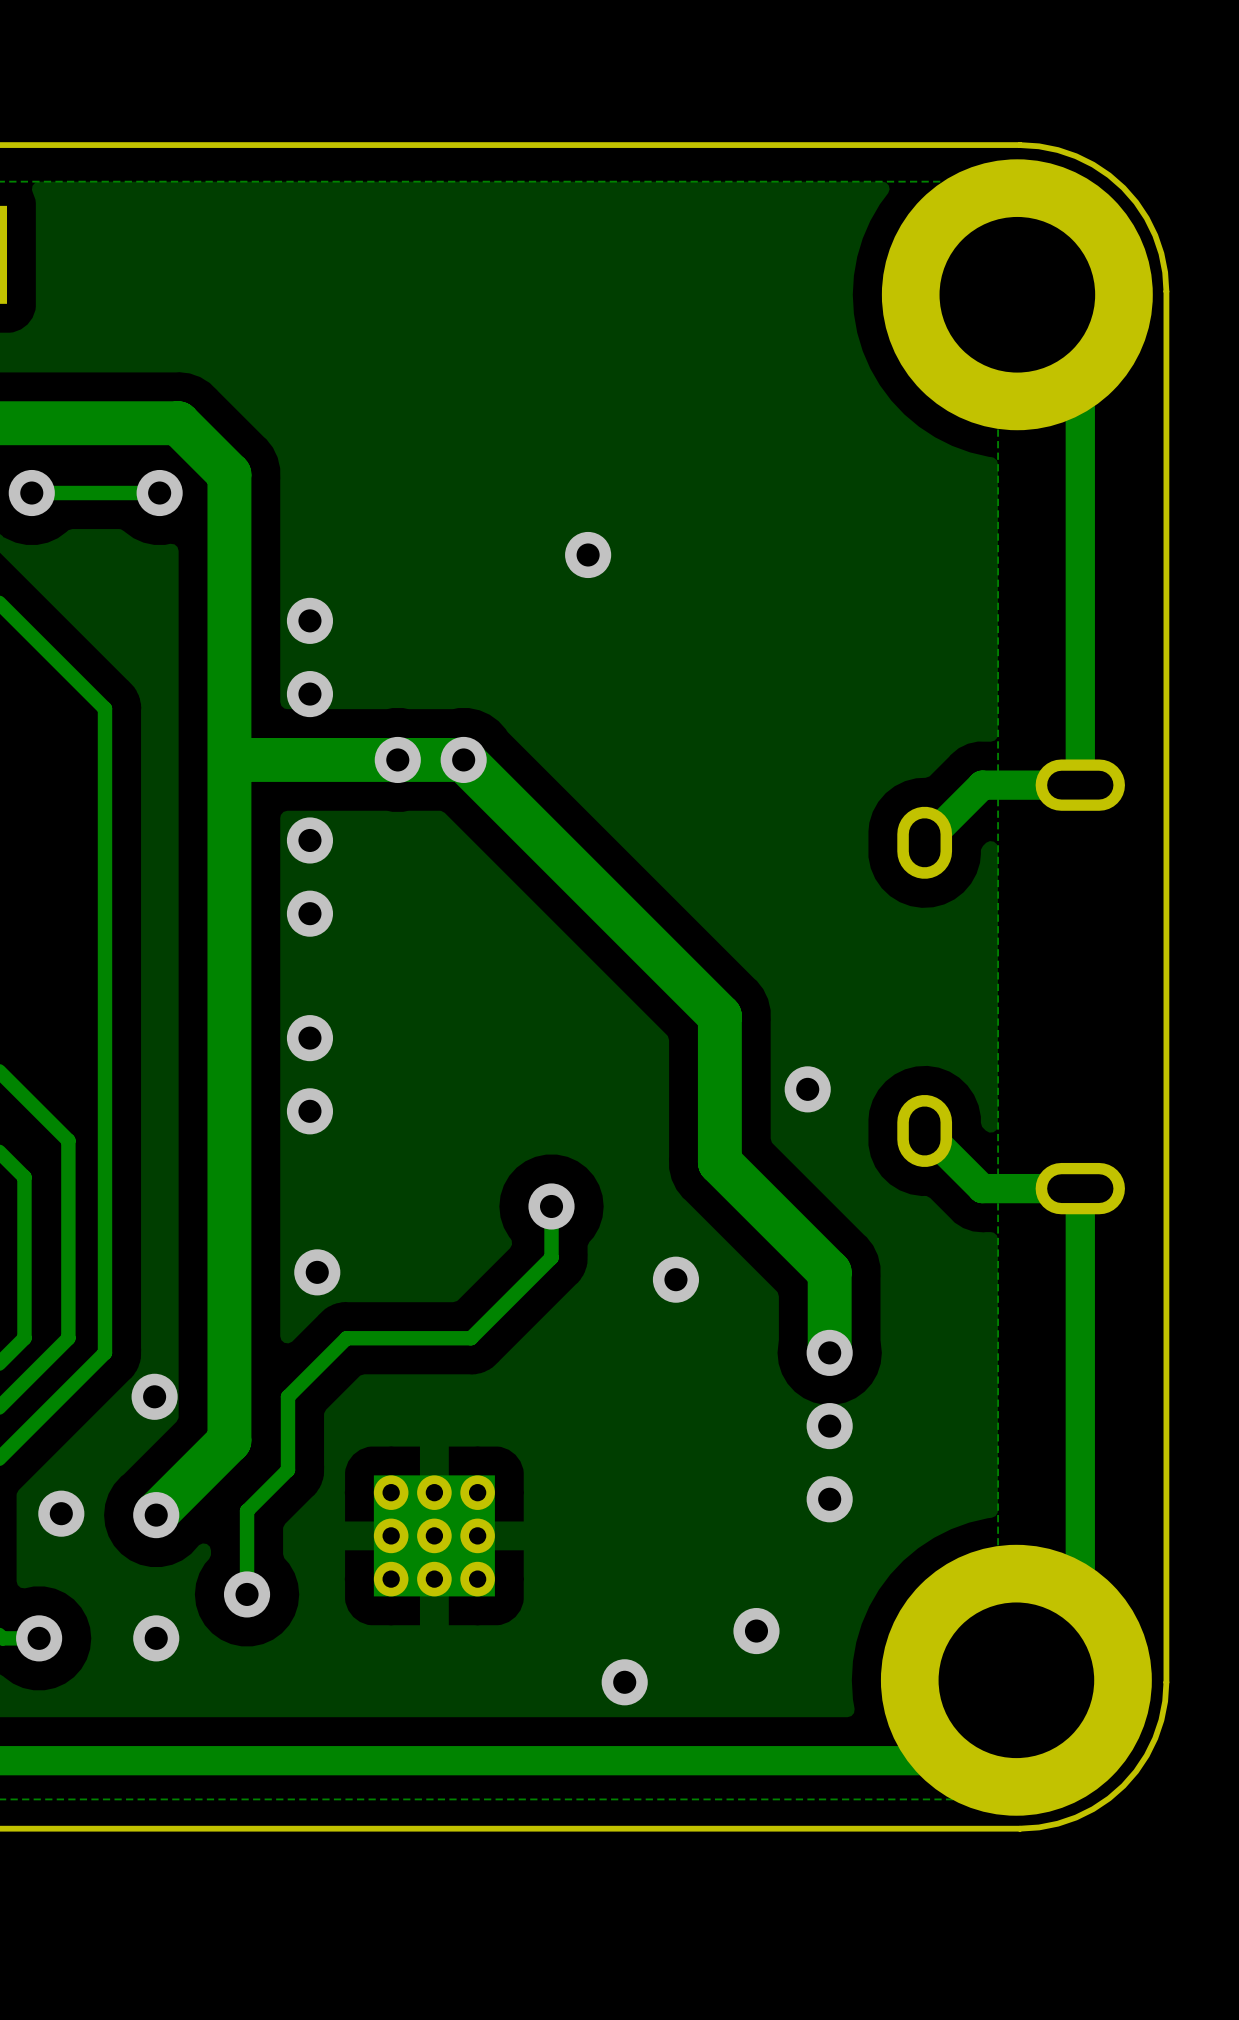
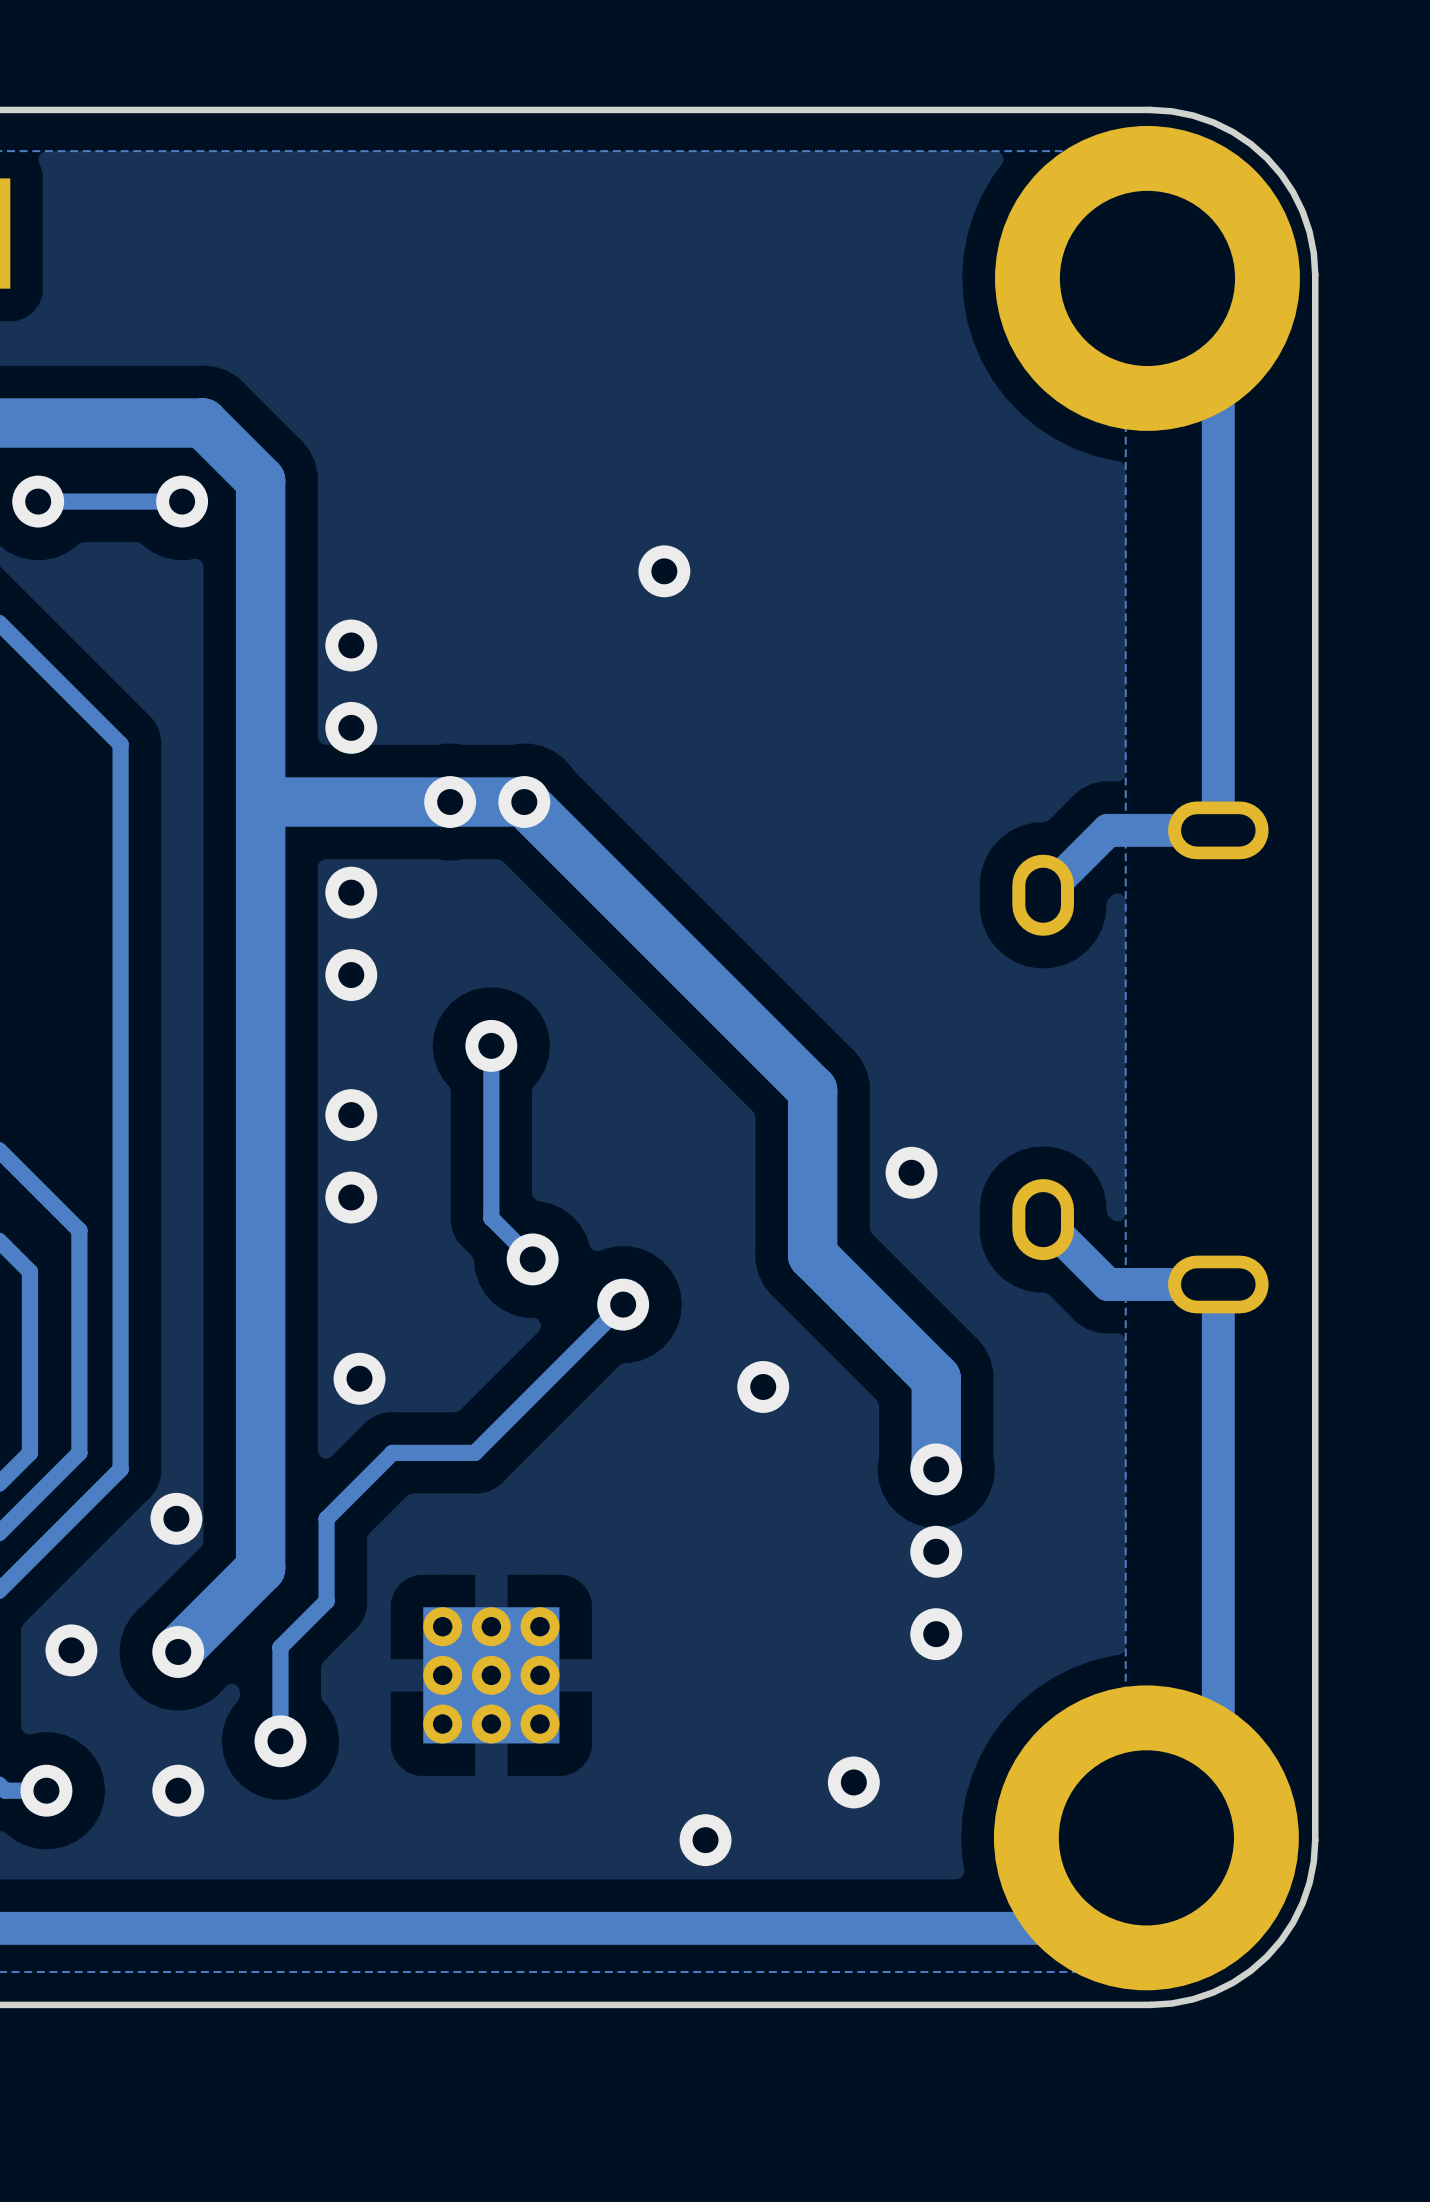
track: none -> (491, 1045) (491, 1218) (532, 1259)
via: none -> (491, 1045)
via: none -> (532, 1259)
track: (551, 1206) (551, 1257) (471, 1338) (419, 1338) -> (623, 1304) (474, 1452)

